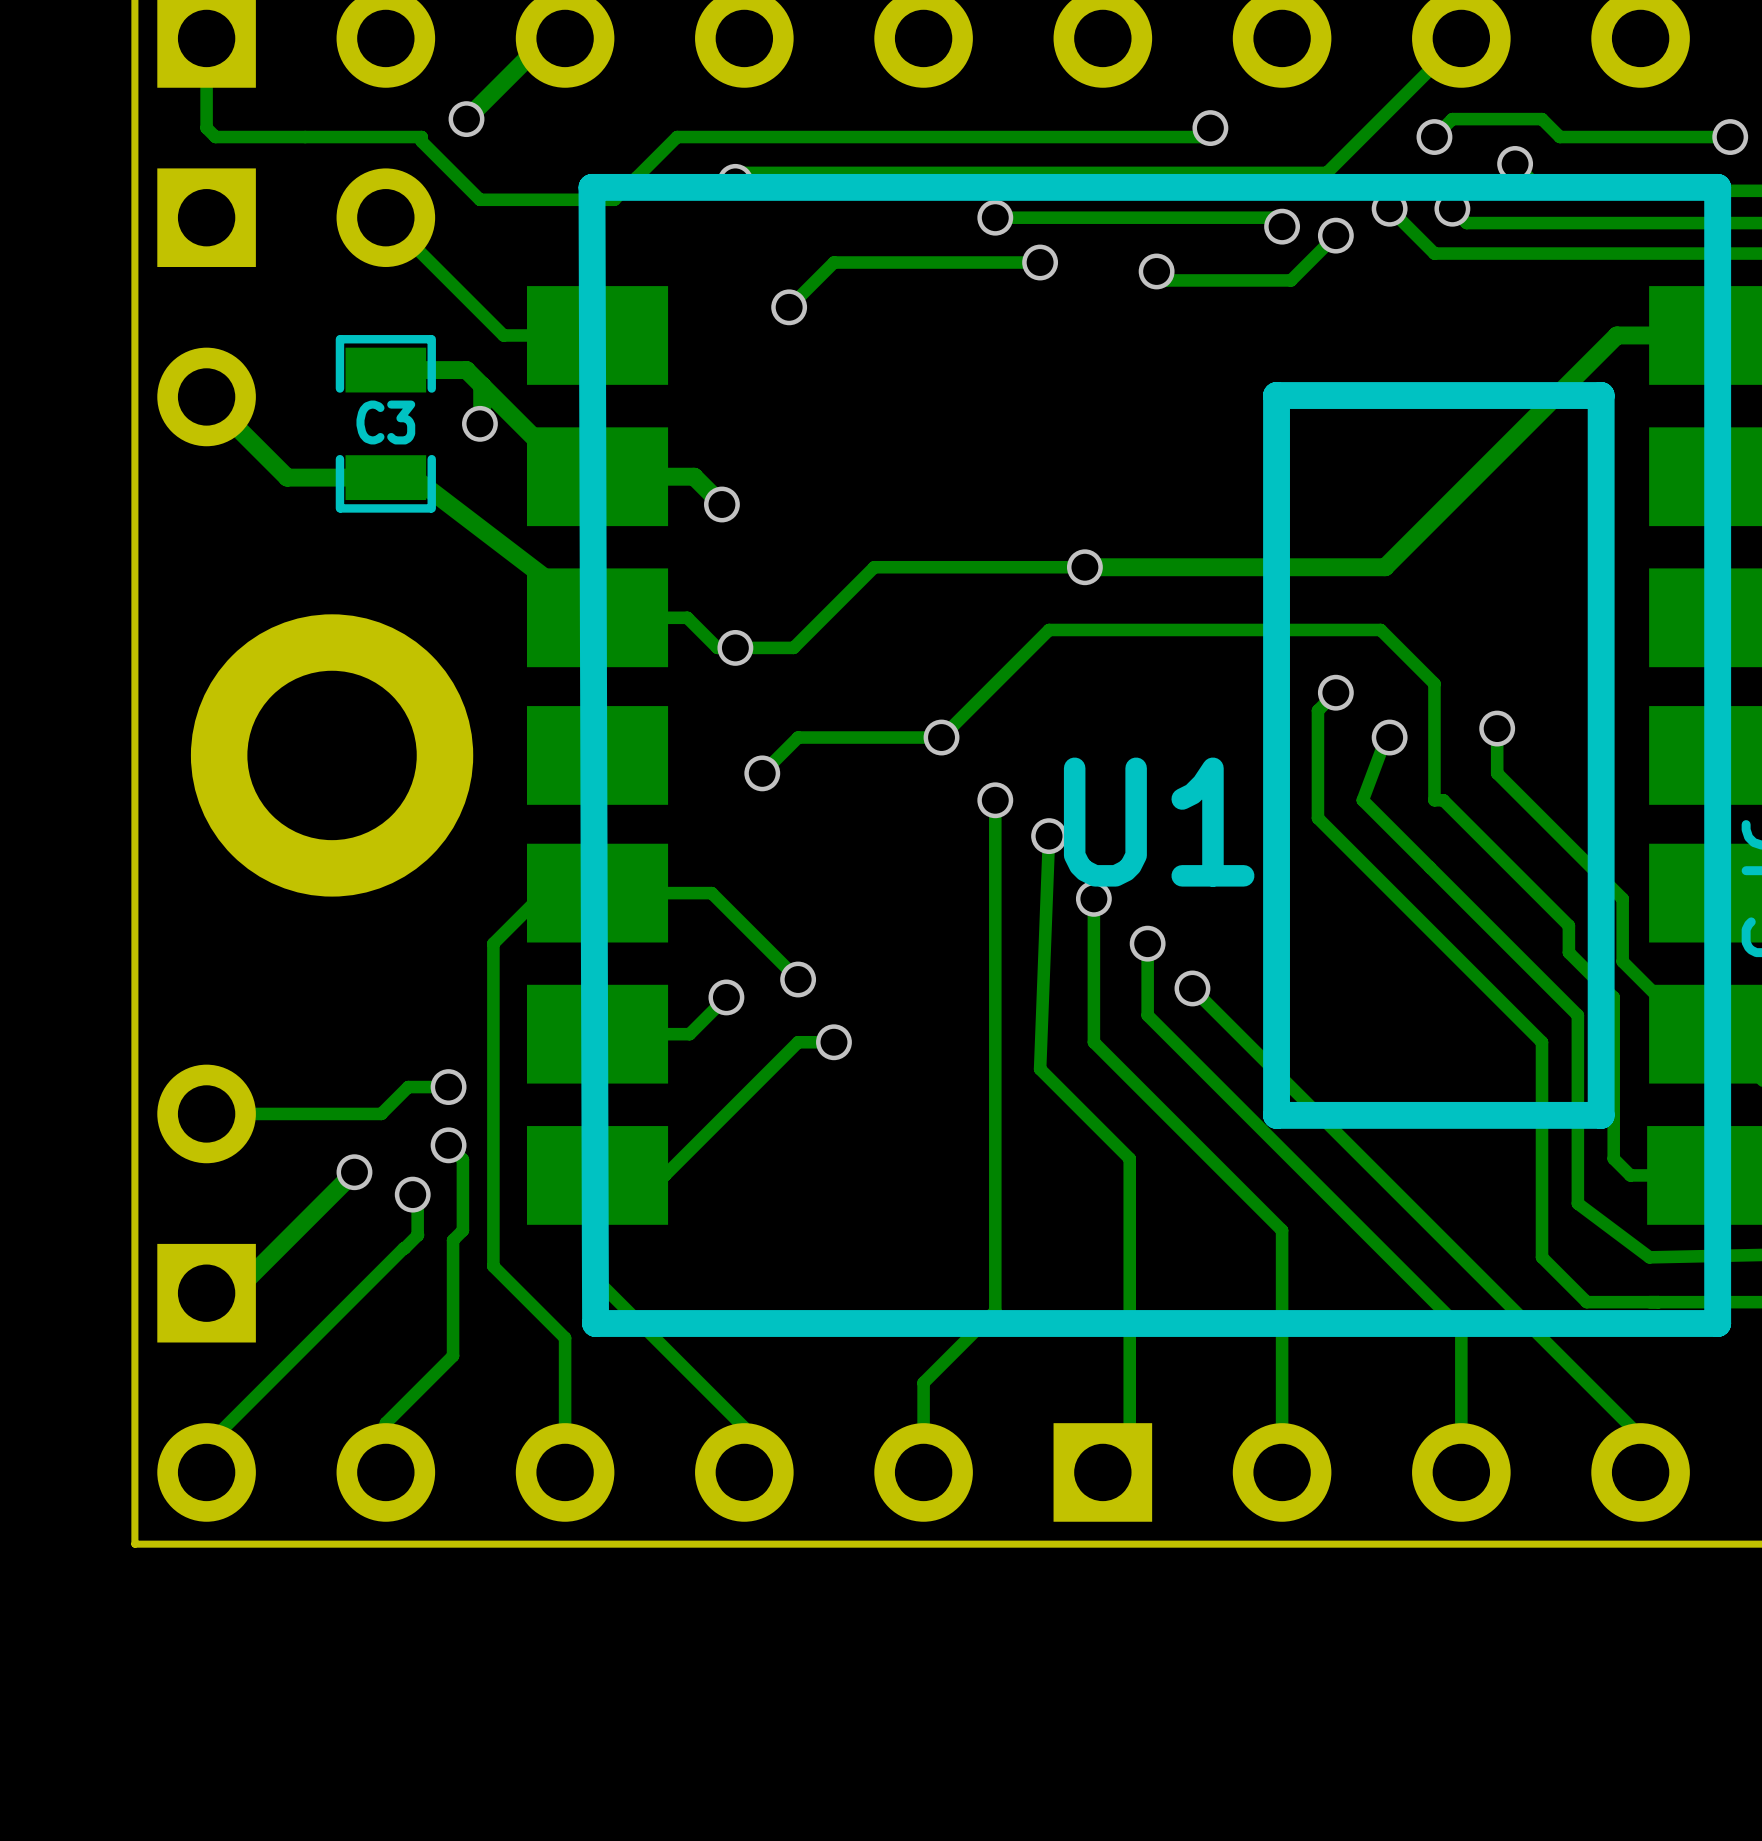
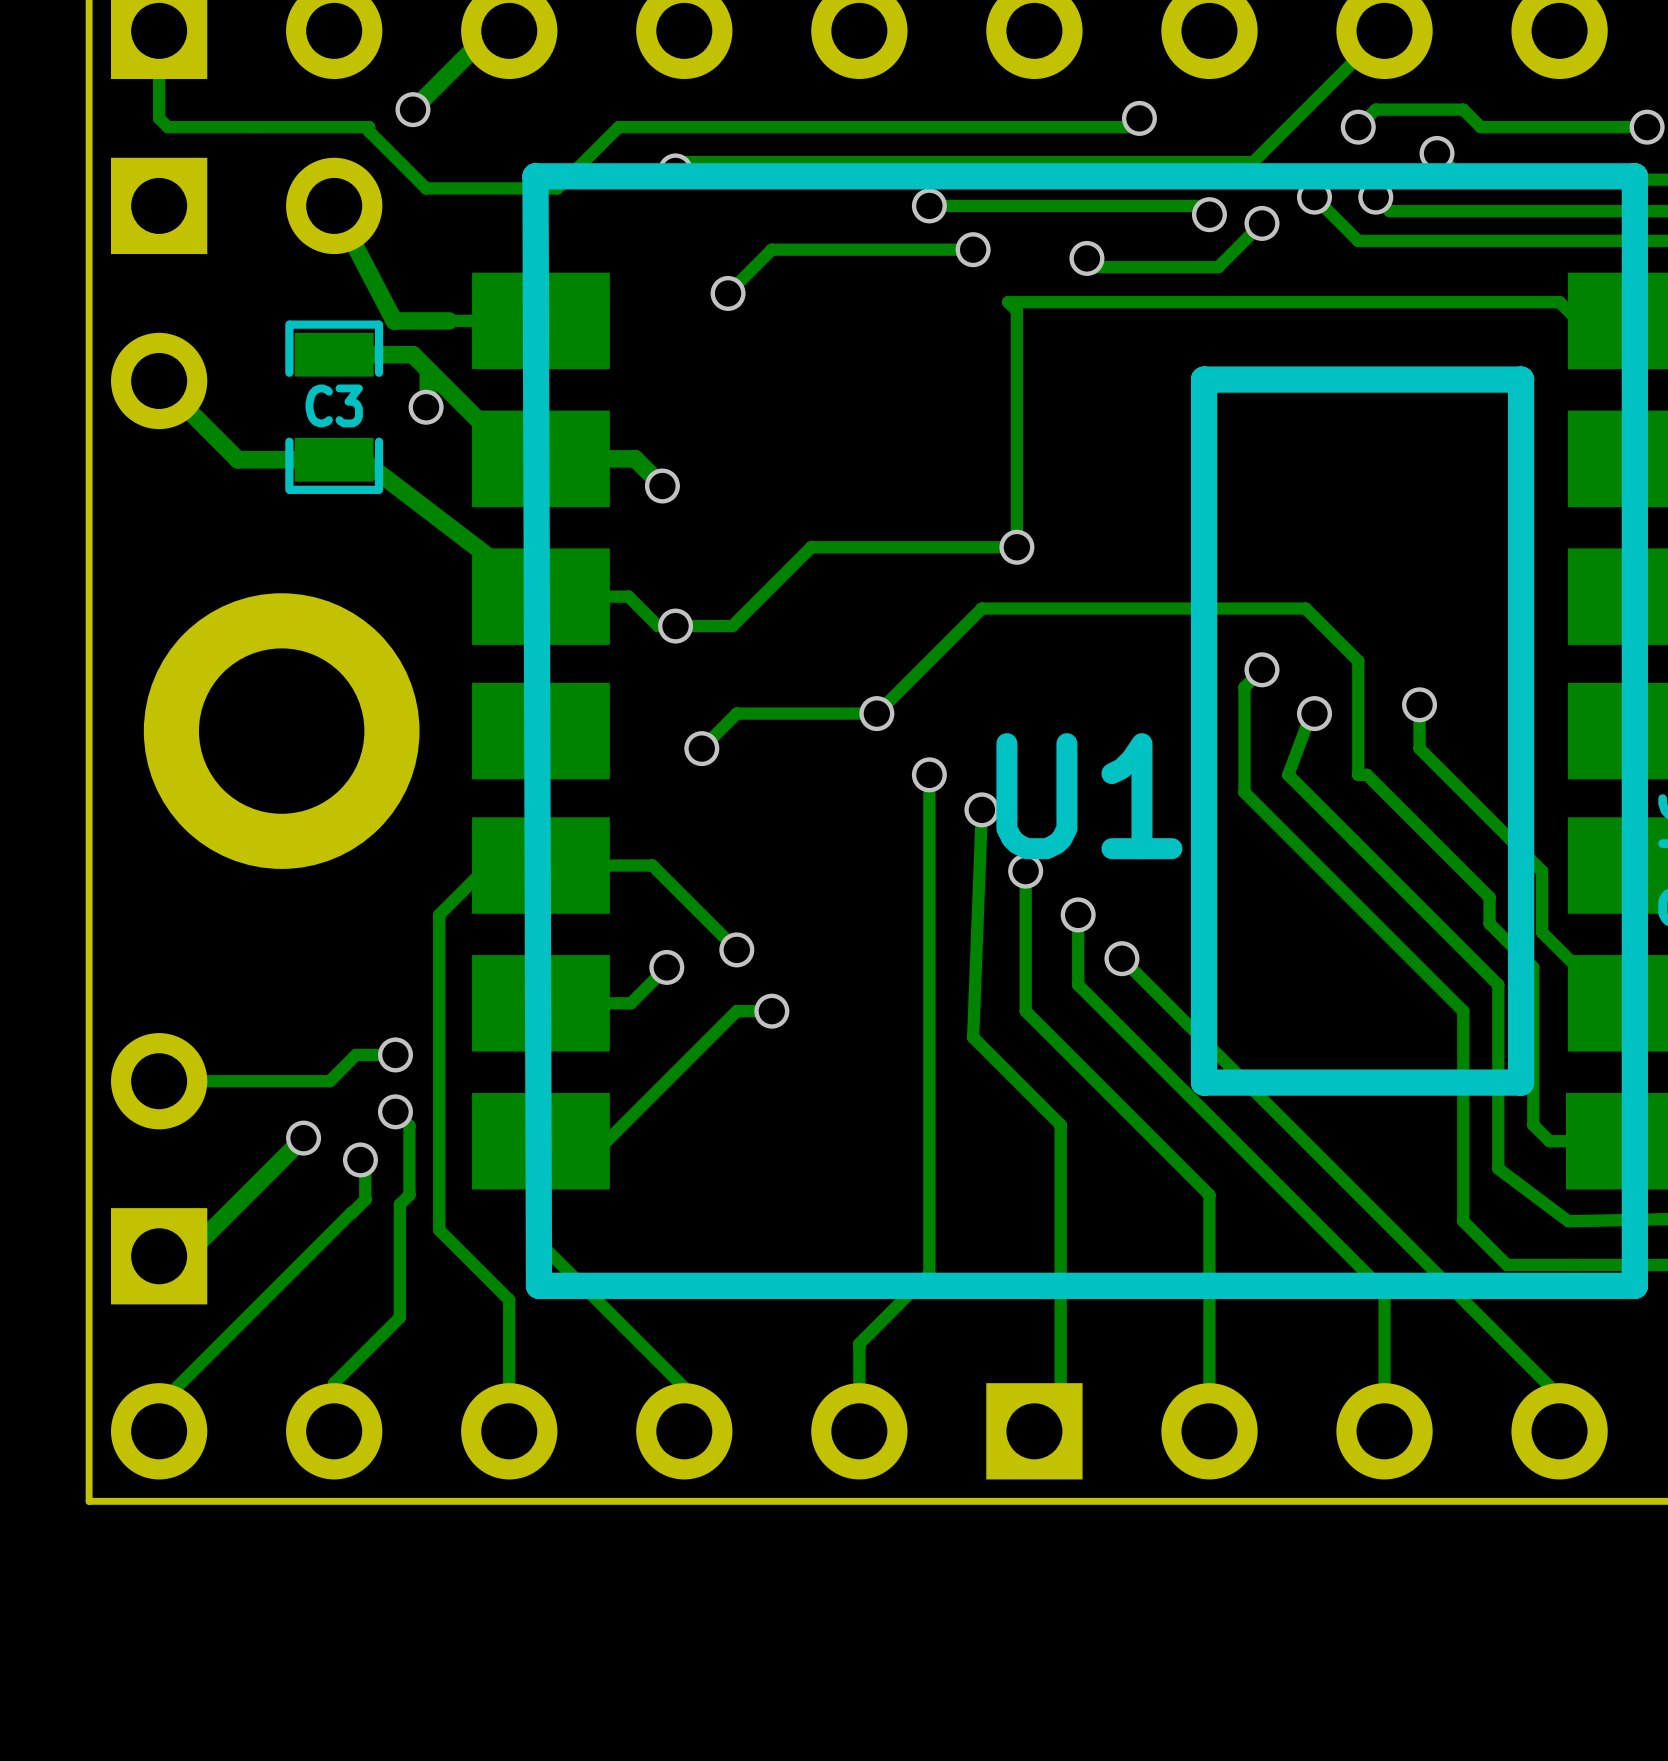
track: (385, 217) (503, 335) -> (334, 205) (394, 320) (449, 320)
track: (1659, 335) (1616, 335) (1385, 567) (1084, 567) -> (1578, 320) (1559, 302) (1008, 302) (1016, 310) (1016, 547)

